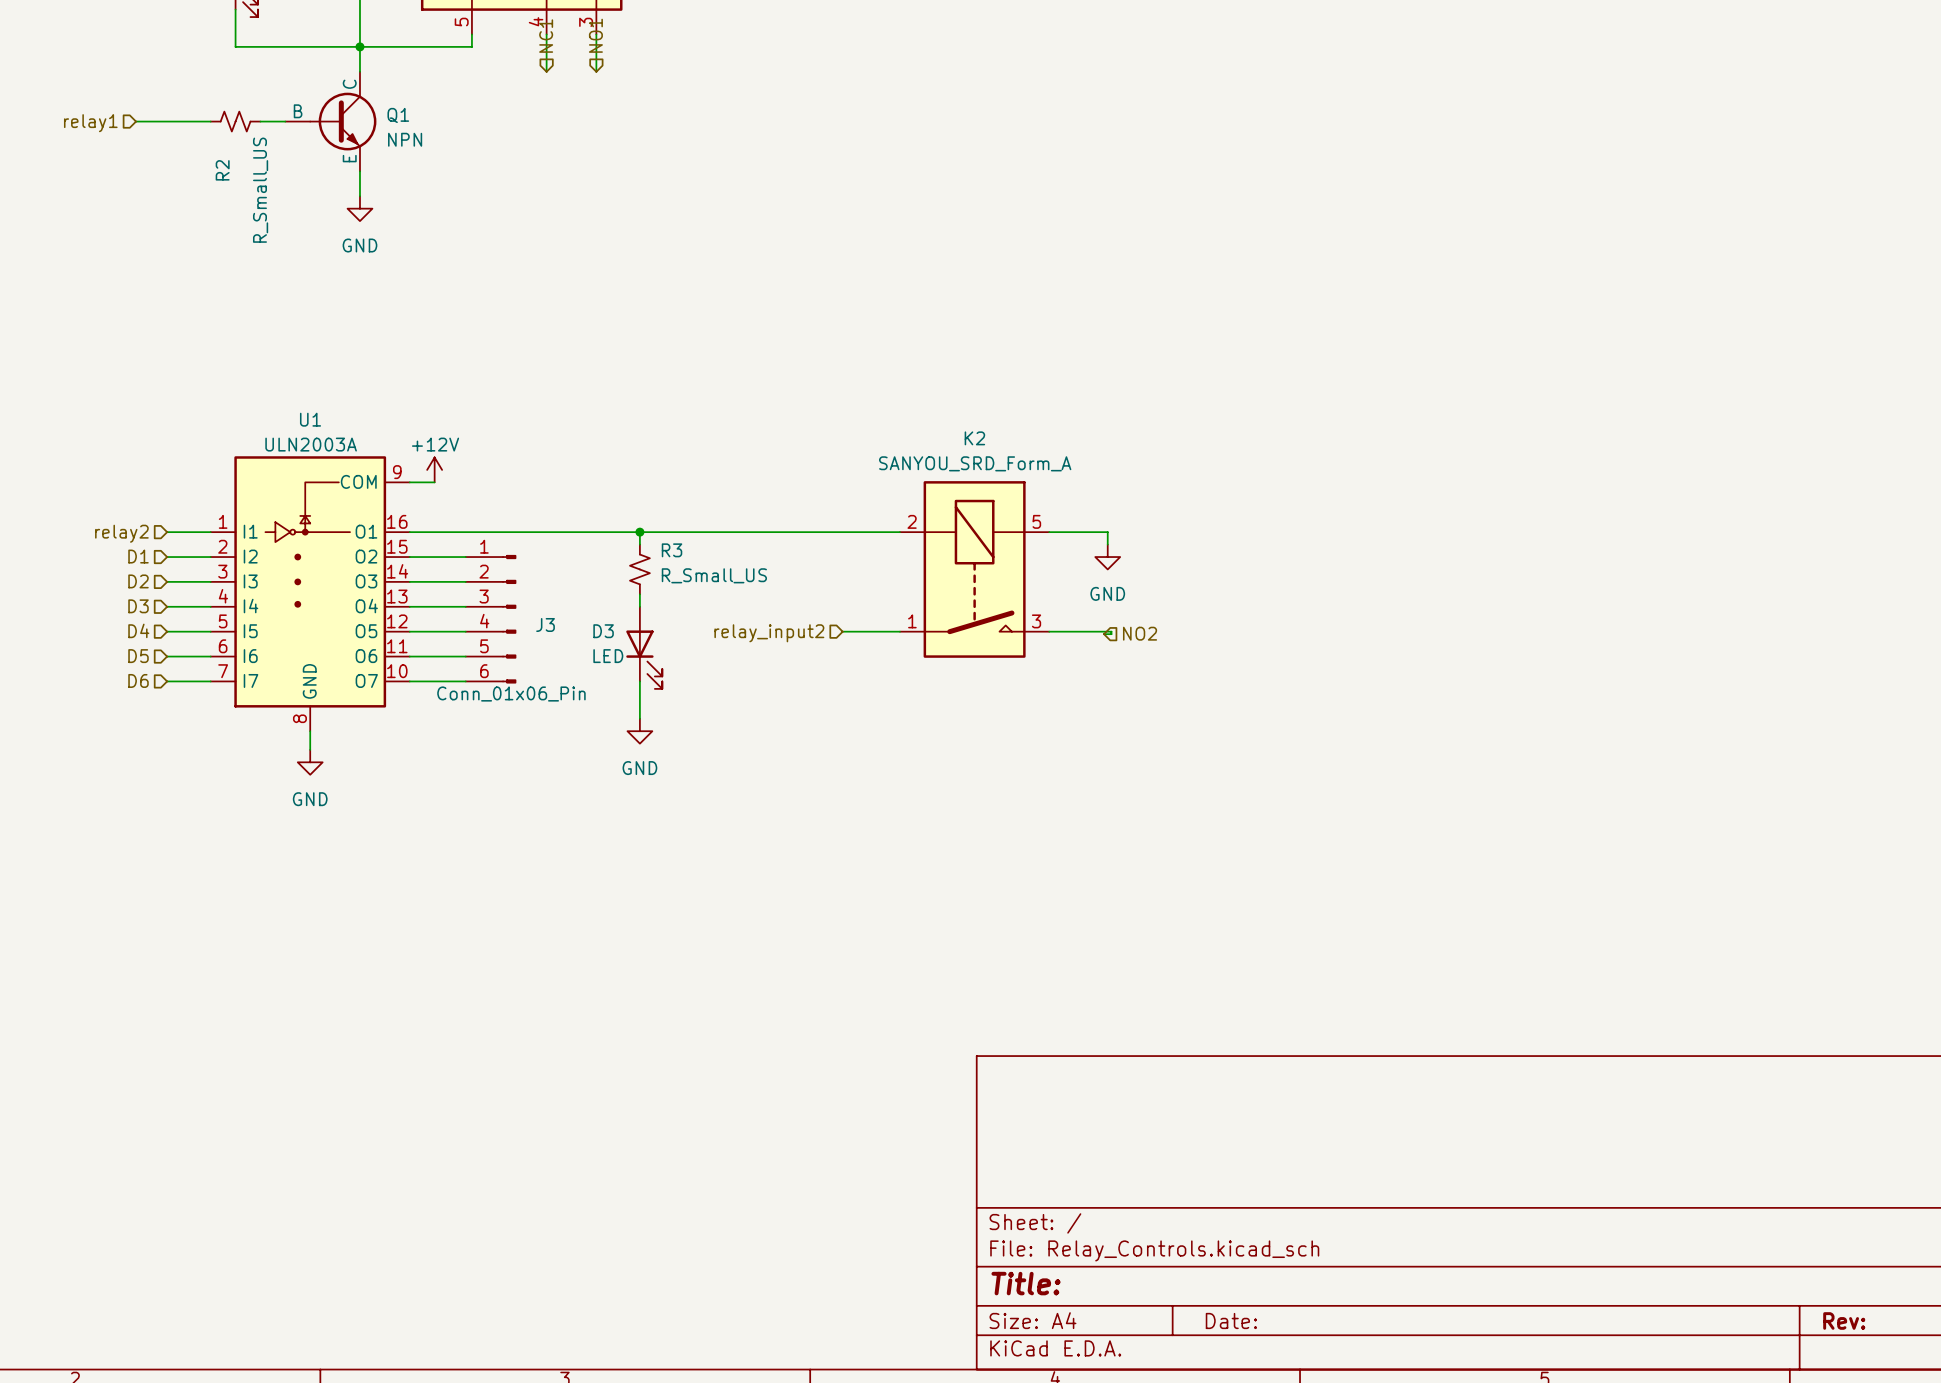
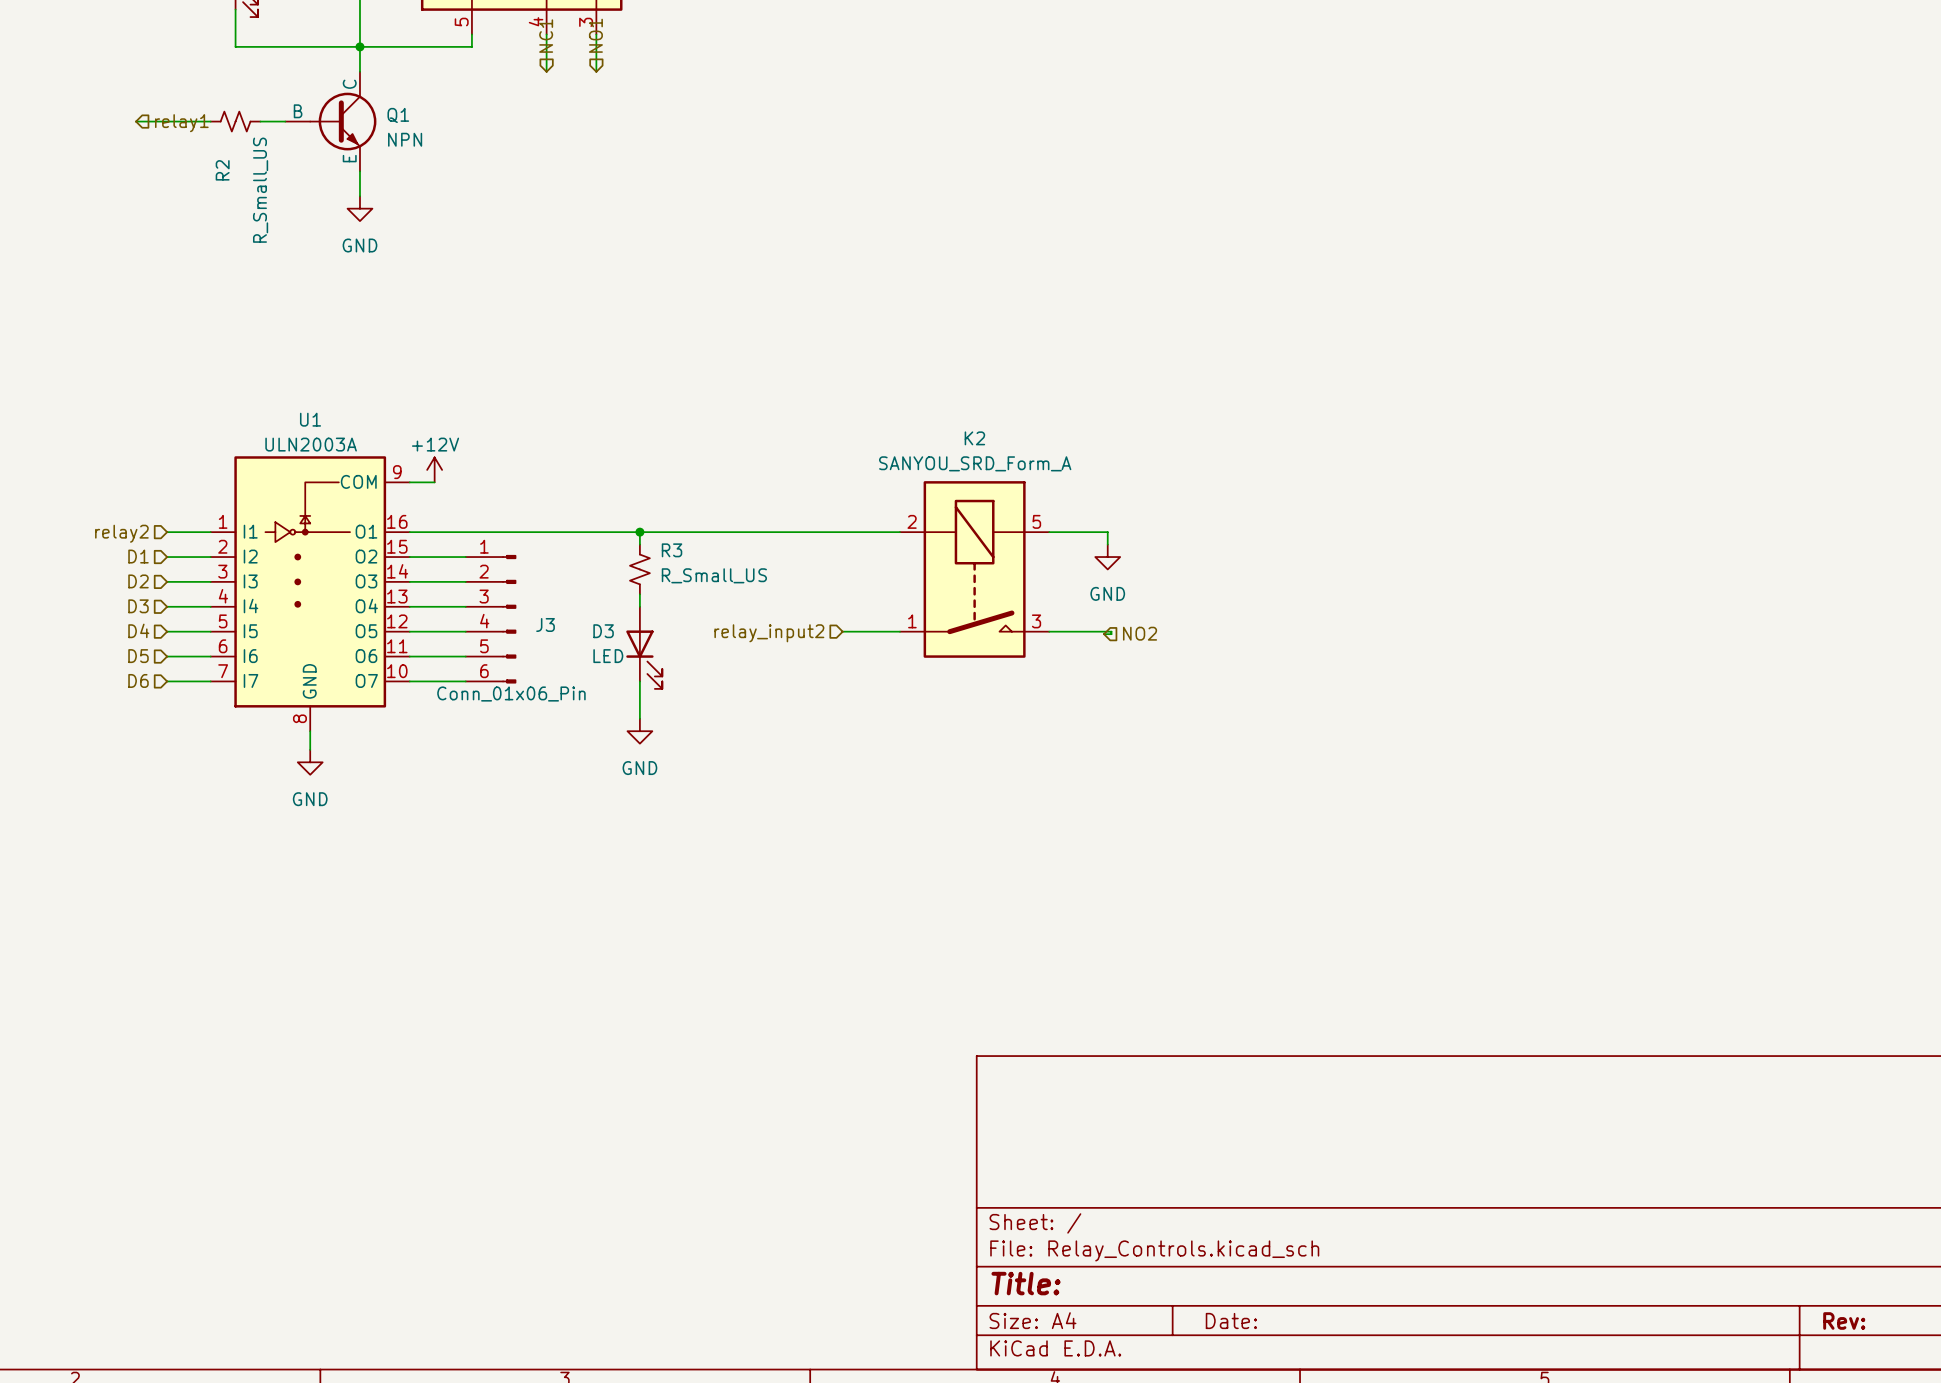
hierarchical label rotation: 0° (90, 123) -> 180° (181, 123)
hierarchical label position: relay1 (90, 123) -> relay1 (181, 123)

